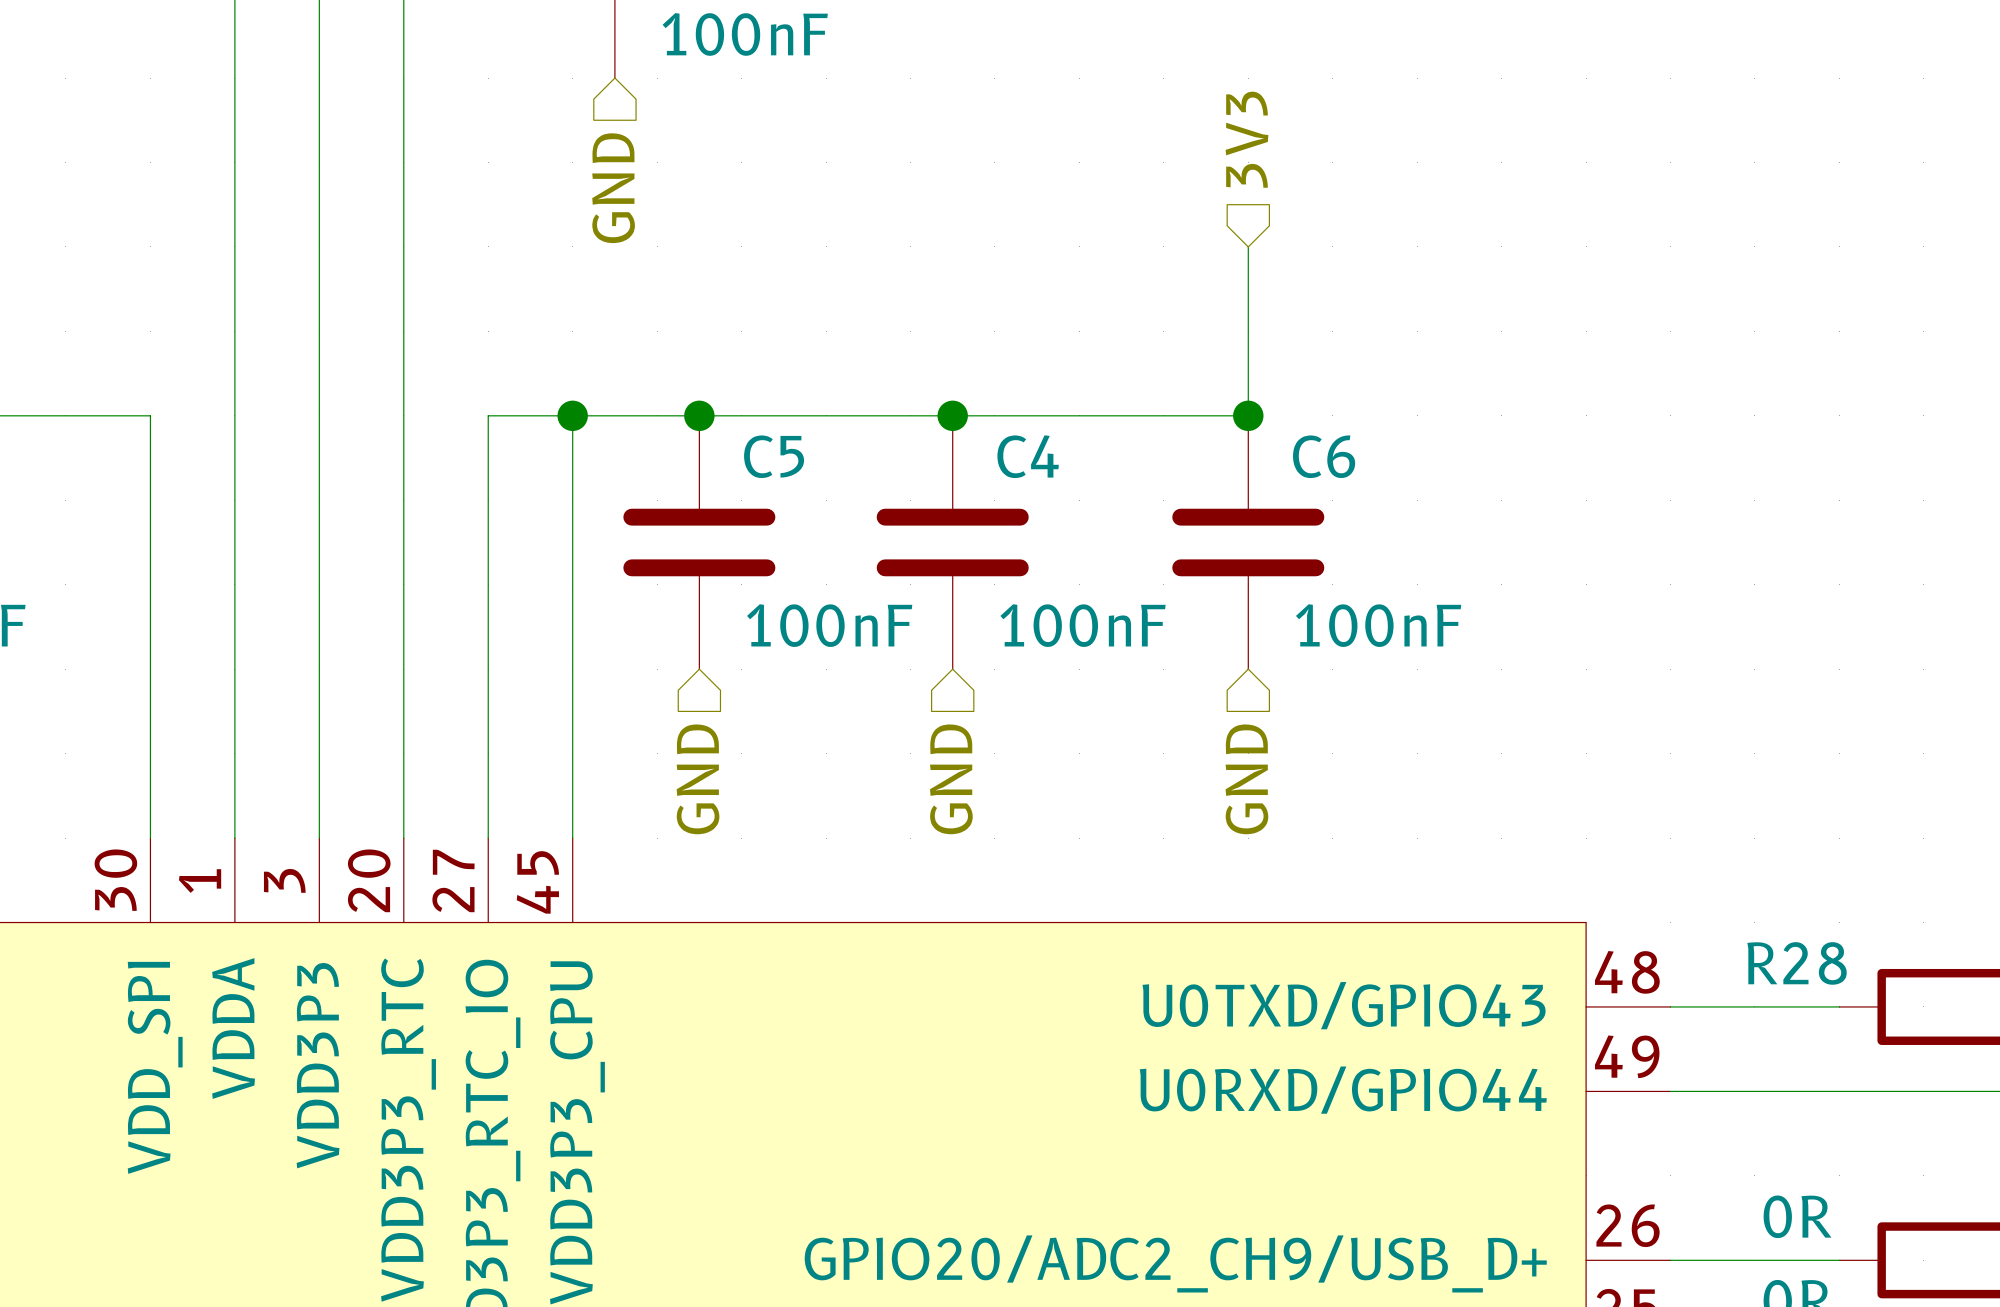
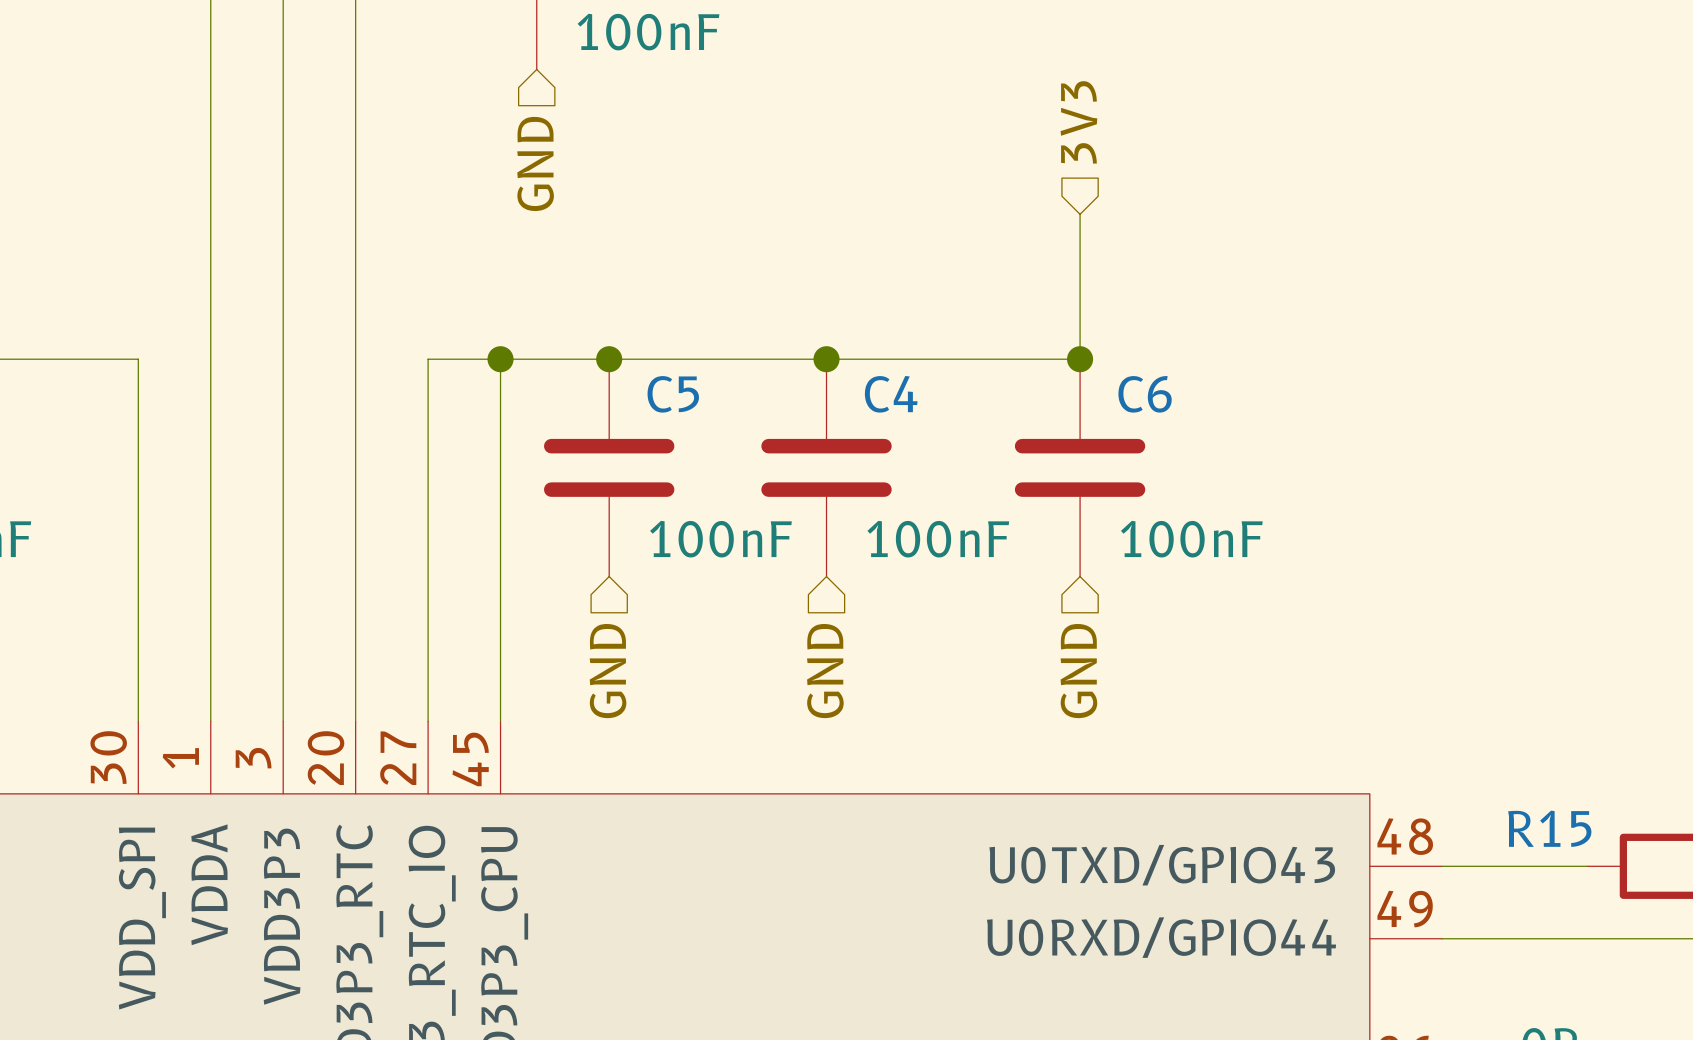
R28 name: R28 (1797, 963) -> R15 (1549, 828)

